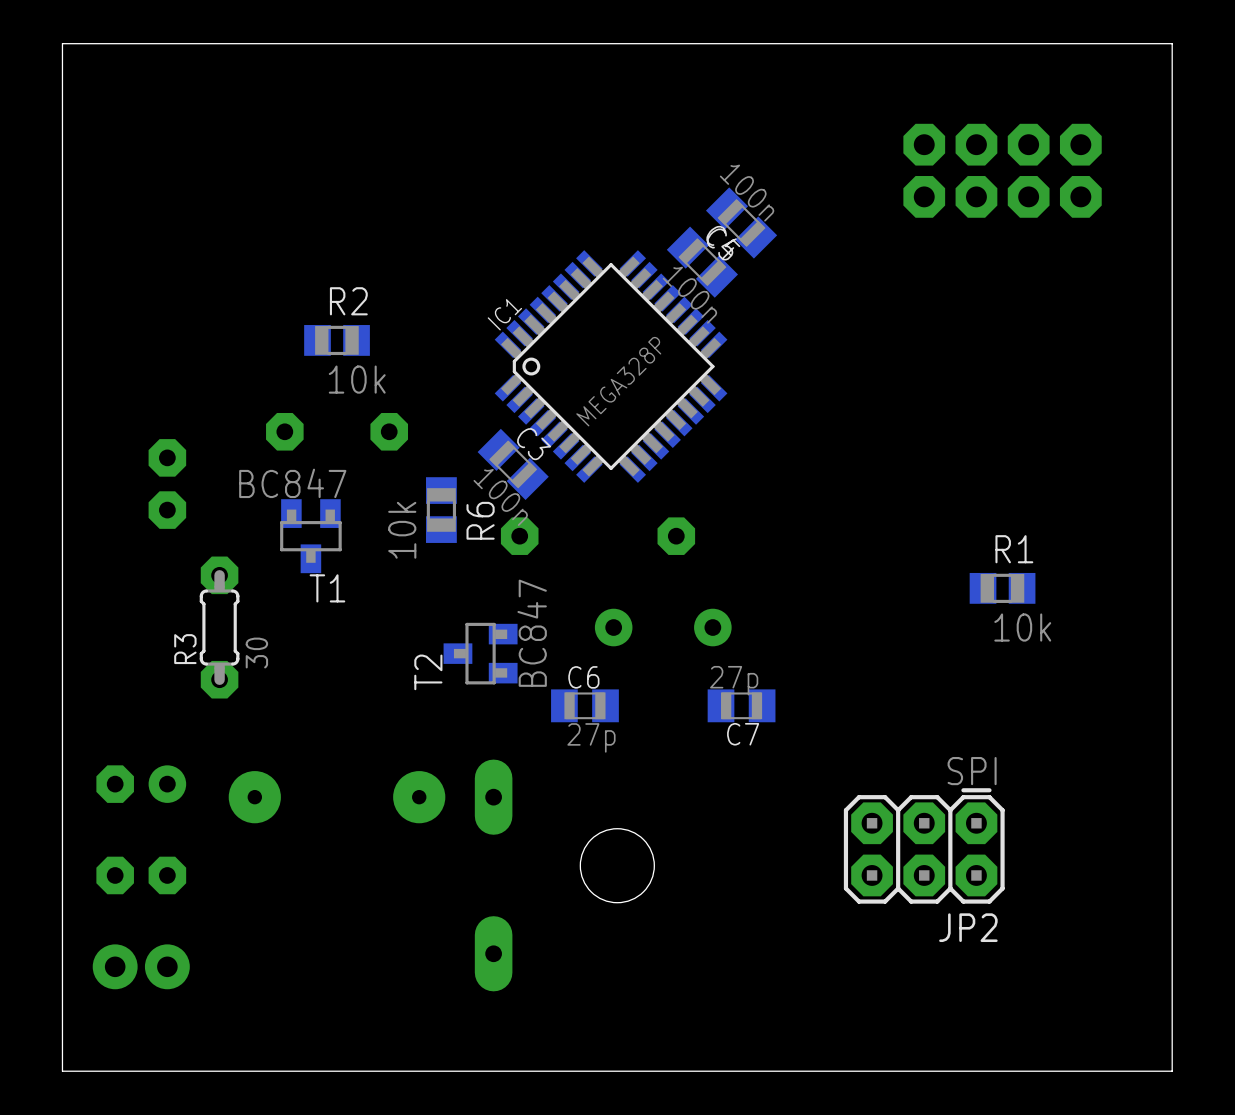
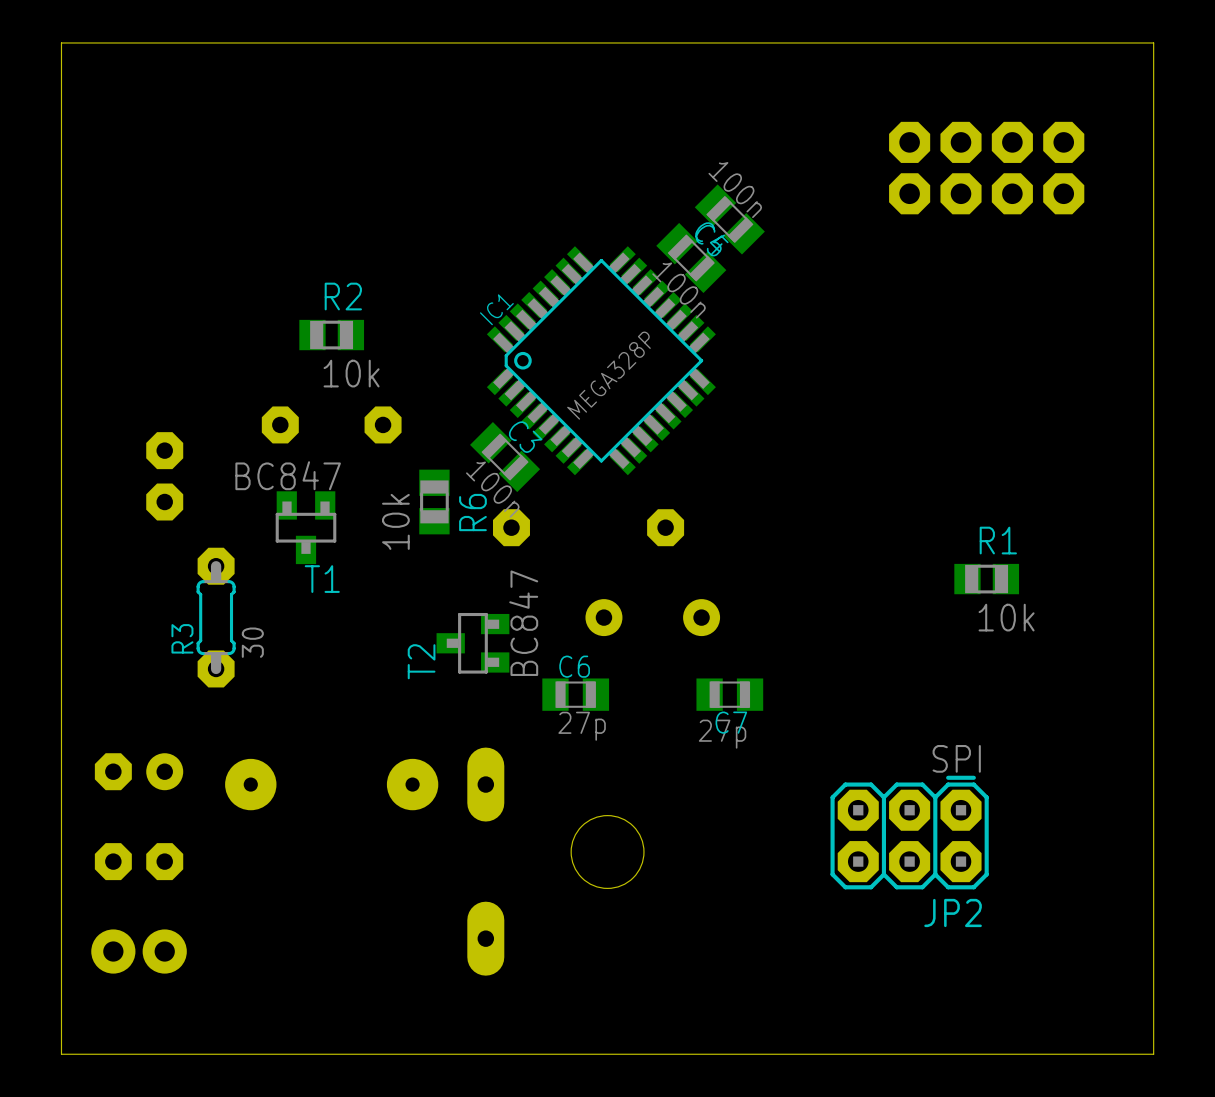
C7 value position: 27p (734, 680) -> 27p (722, 734)

